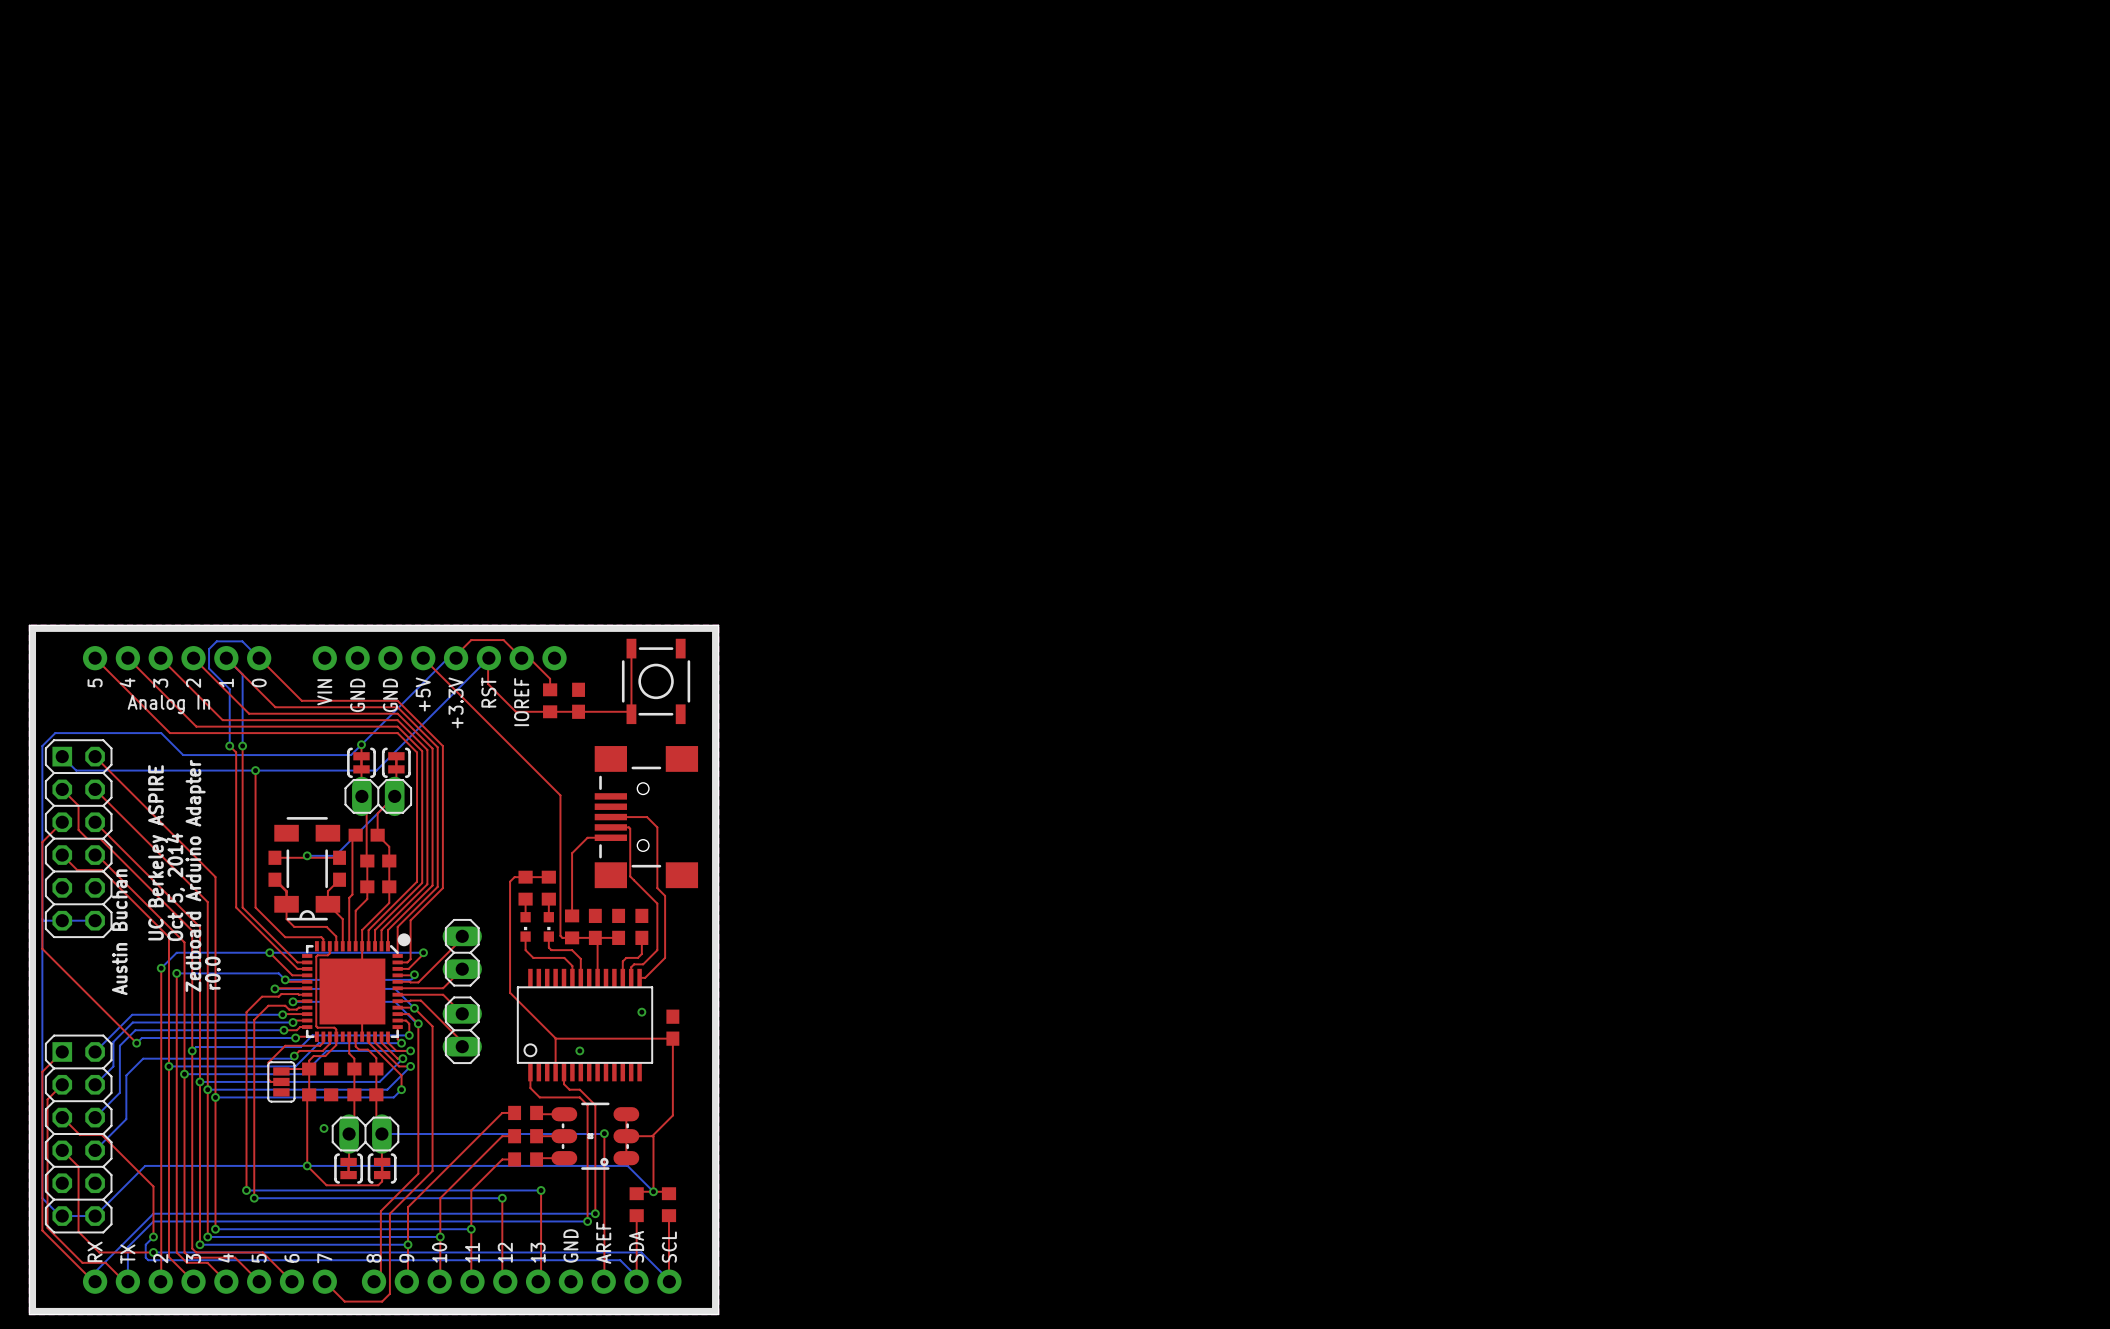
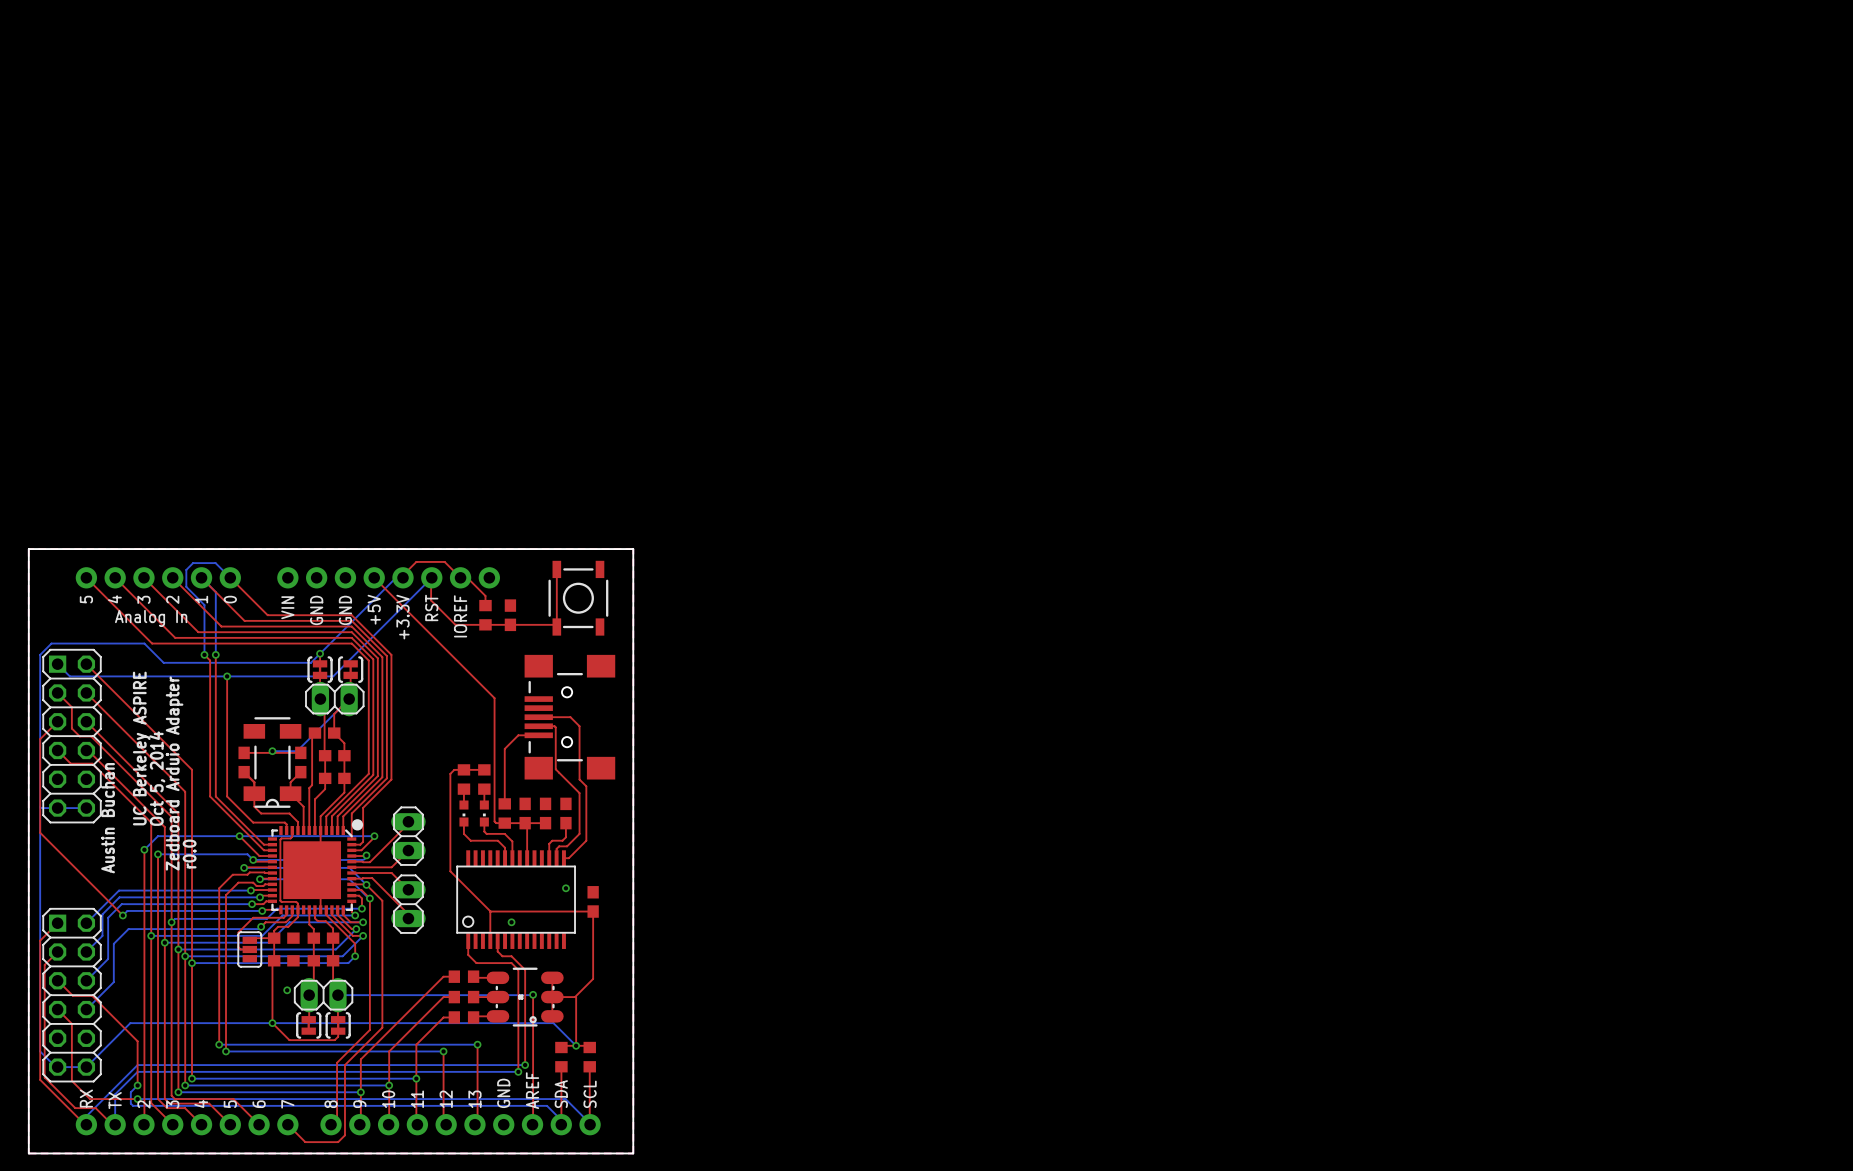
line: (32, 628) (715, 628) (715, 1311) (32, 1311) (32, 628) -> none
drawing shape: [111, 759, 221, 996] -> [101, 671, 197, 874]

